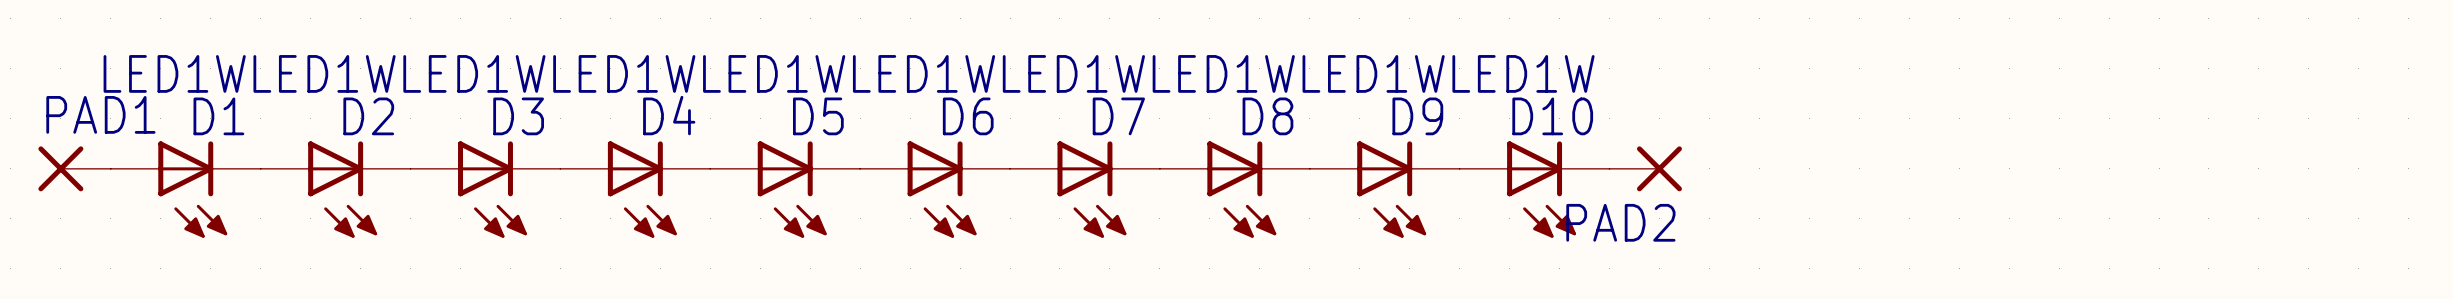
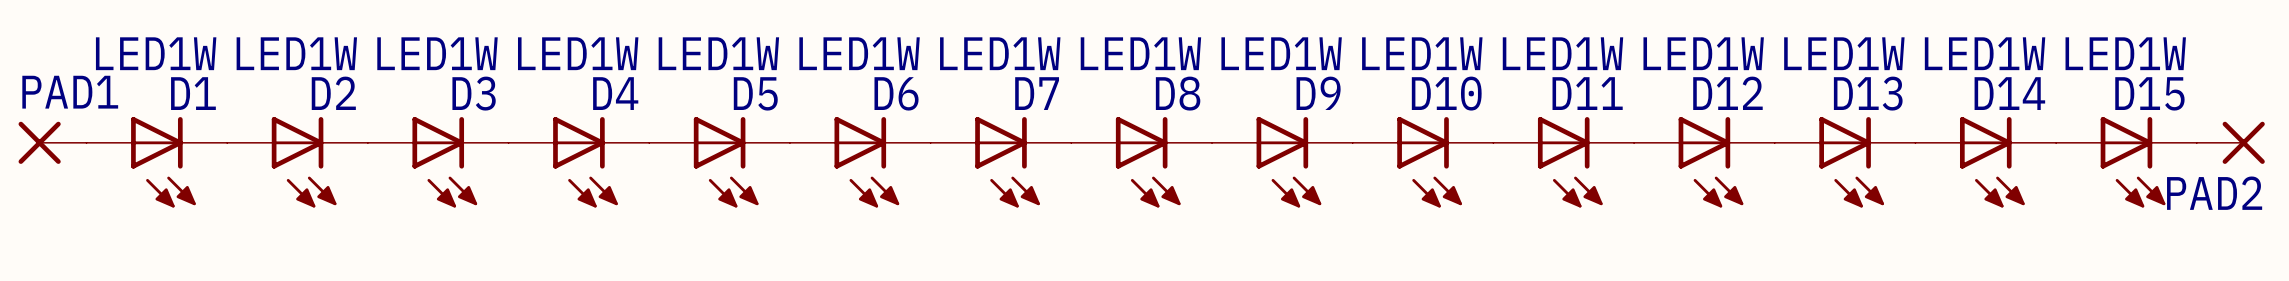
PAD2 position: (1645, 168) -> (2230, 142)
D11: none -> LED1W (1563, 162)
D12: none -> LED1W (1704, 162)
D13: none -> LED1W (1845, 162)
D14: none -> LED1W (1985, 162)
D15: none -> LED1W (2126, 162)

